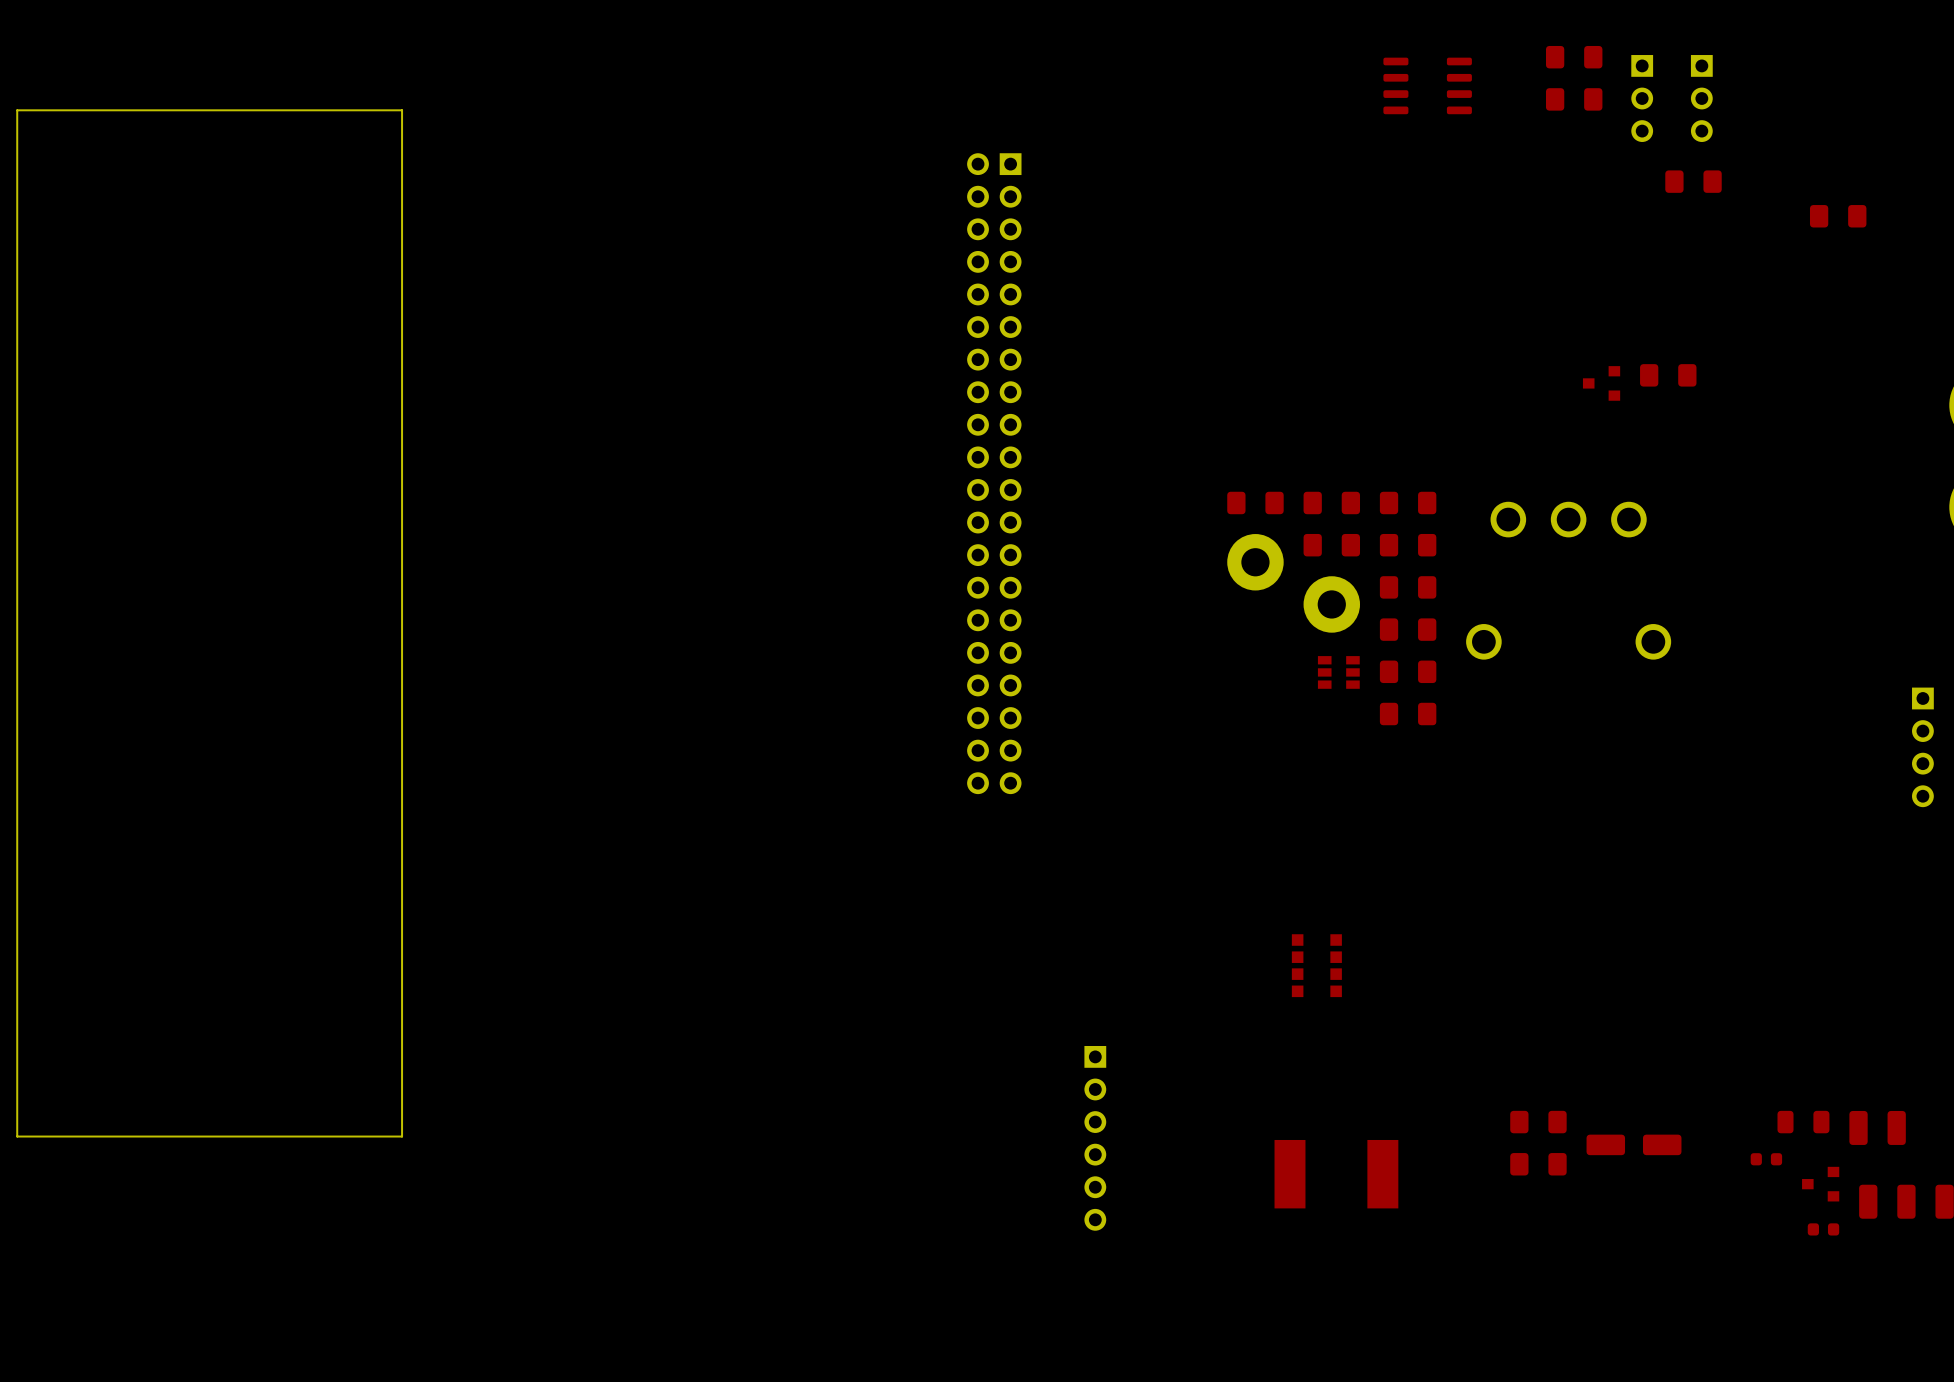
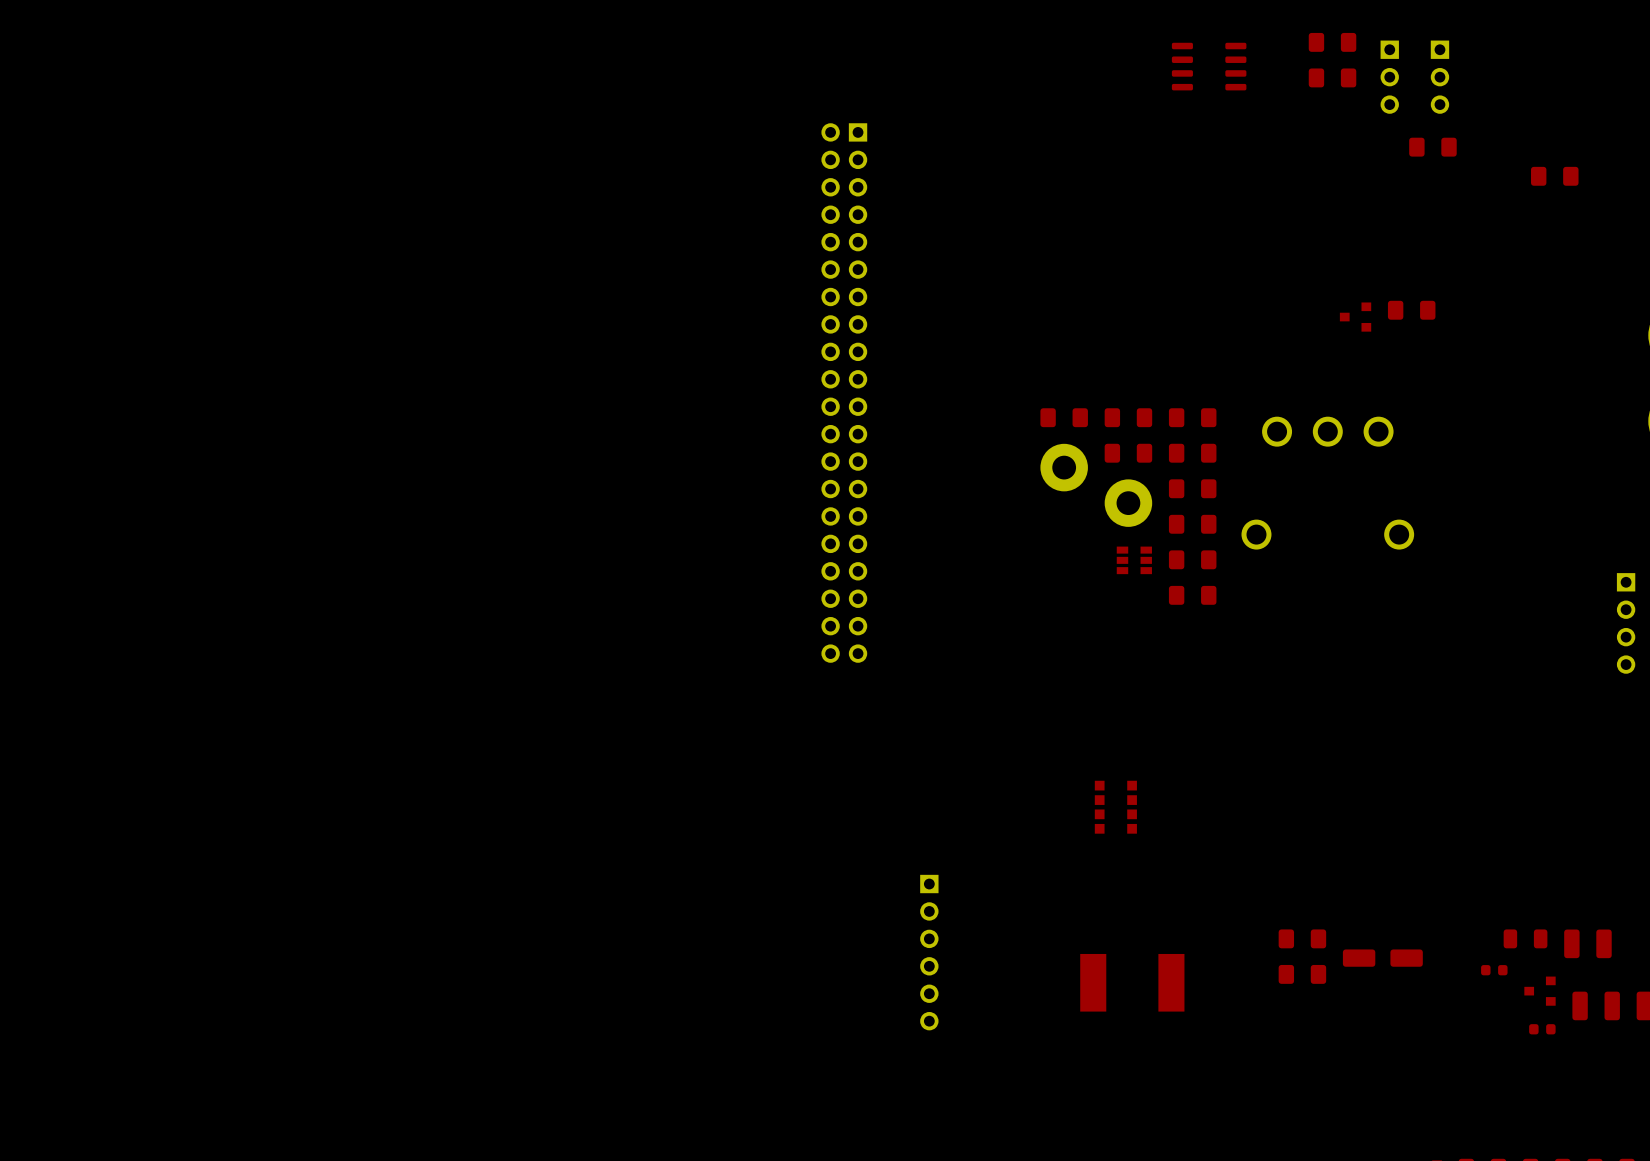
board edge: (402, 110) (17, 110) (17, 1136) (402, 1136) (402, 110) -> none

